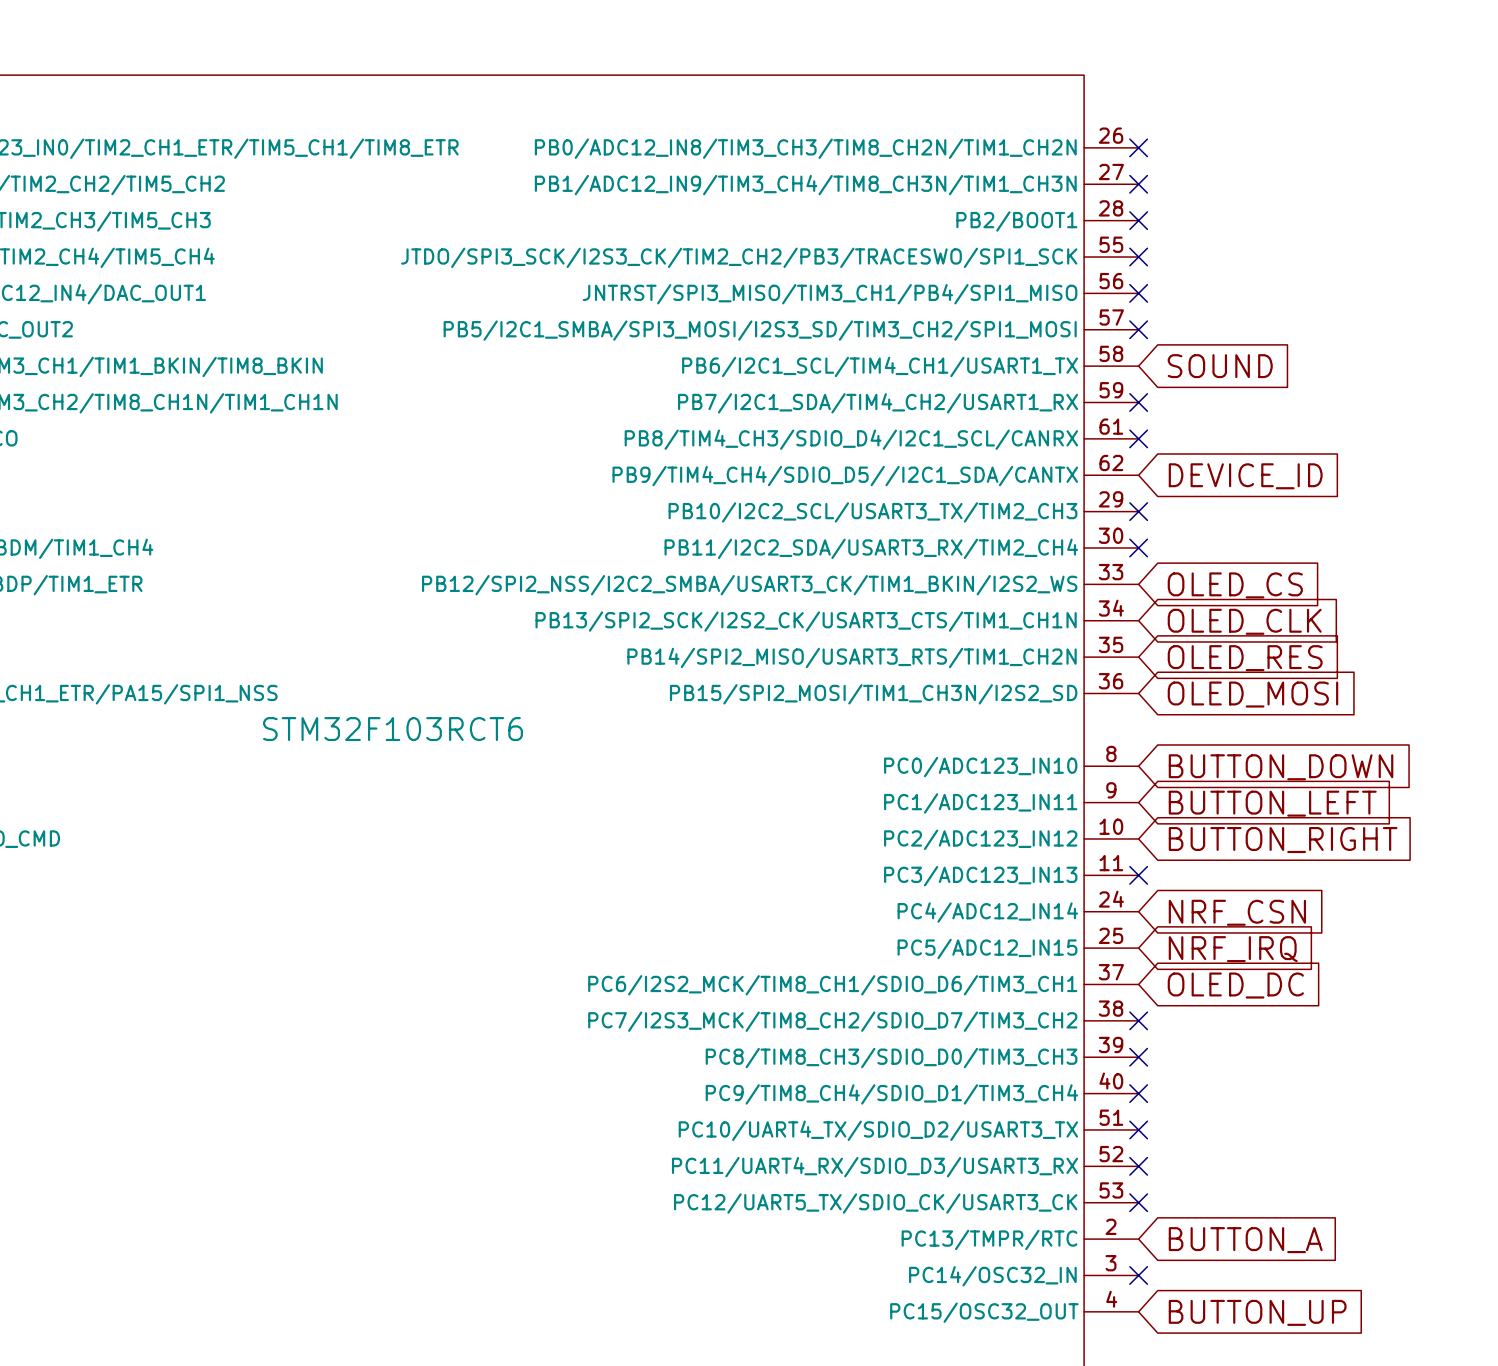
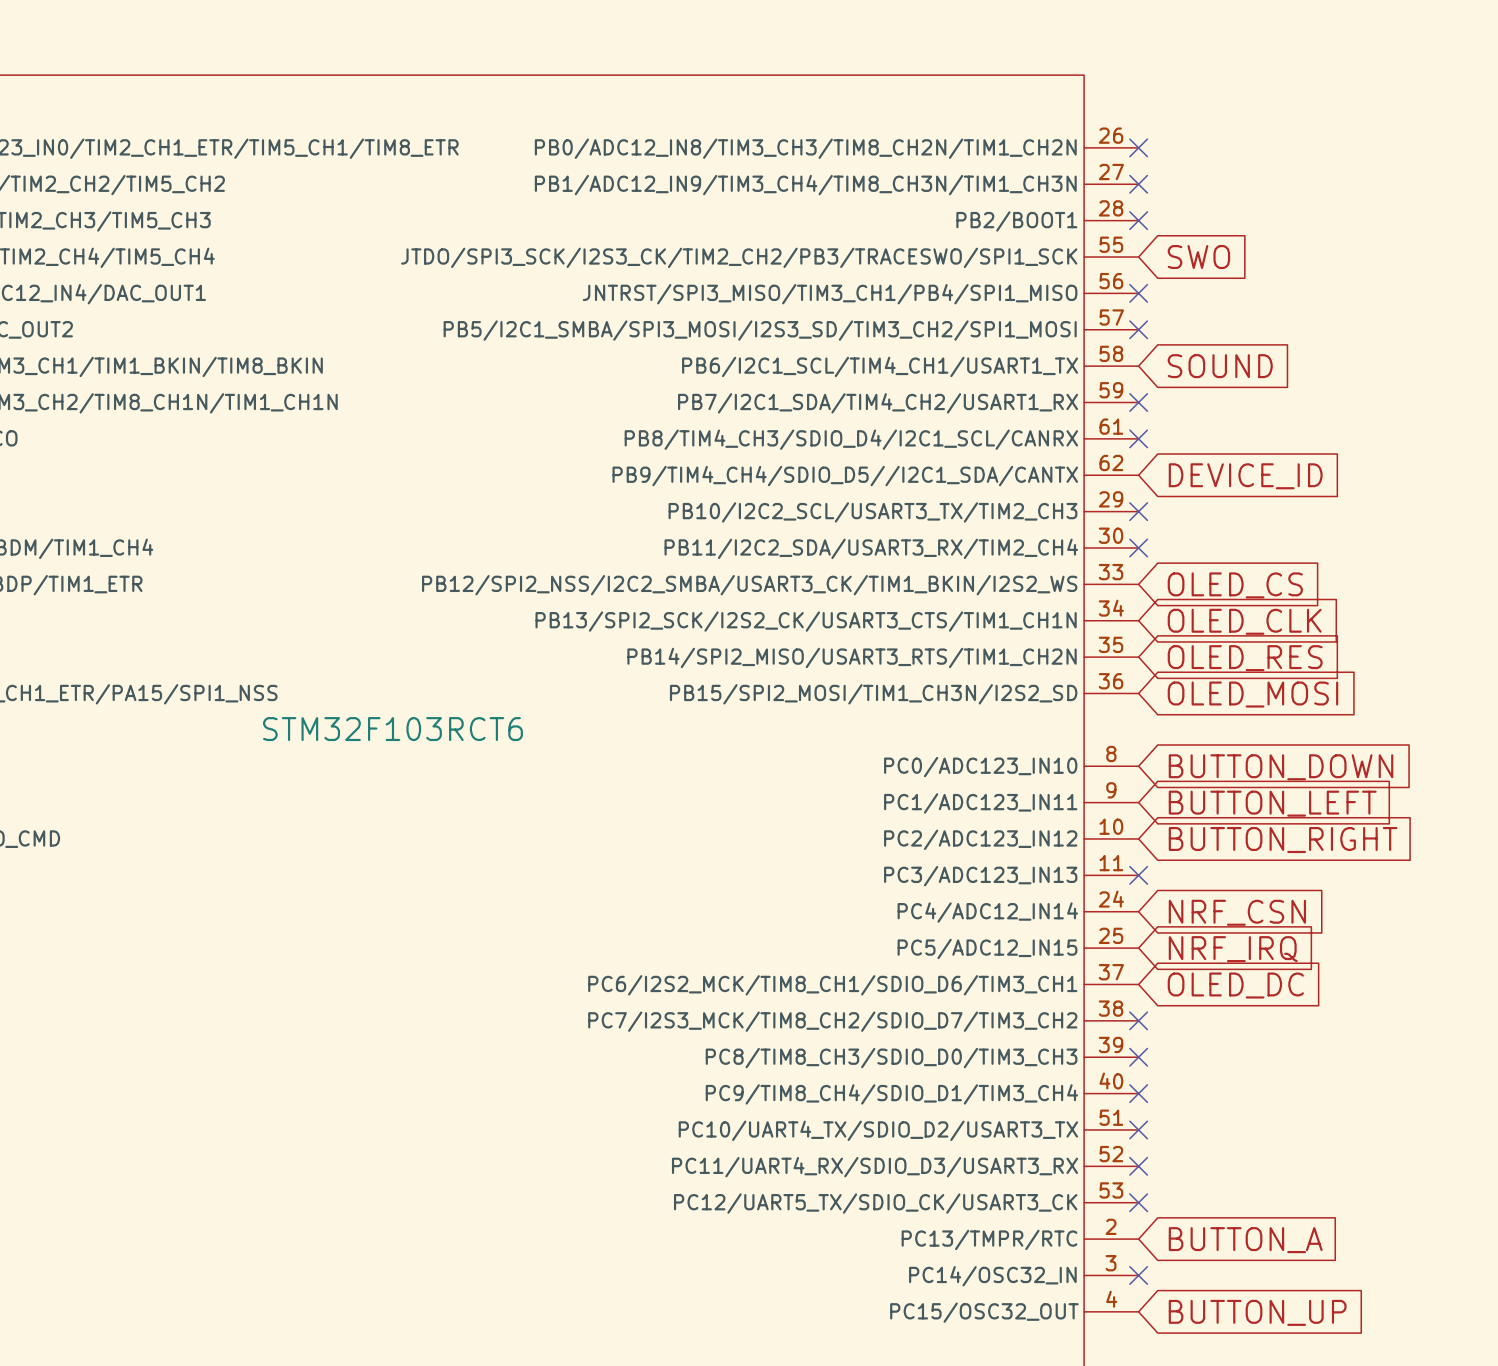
no-connect mark: (1138, 257) -> none
global label: none -> SWO (1198, 257)

